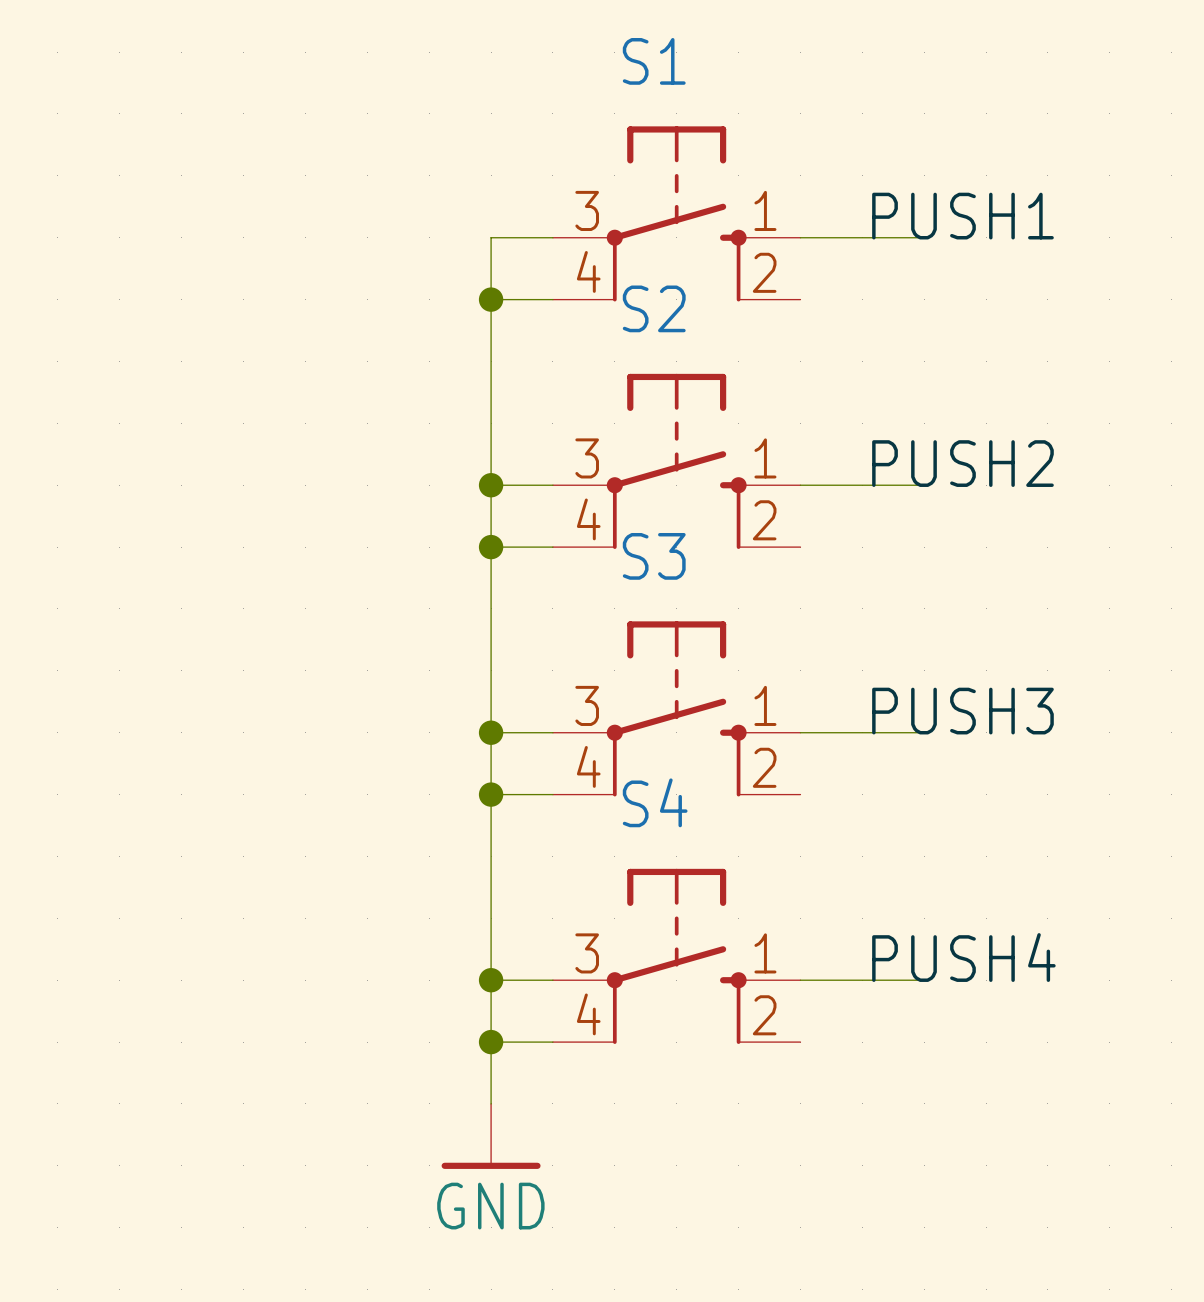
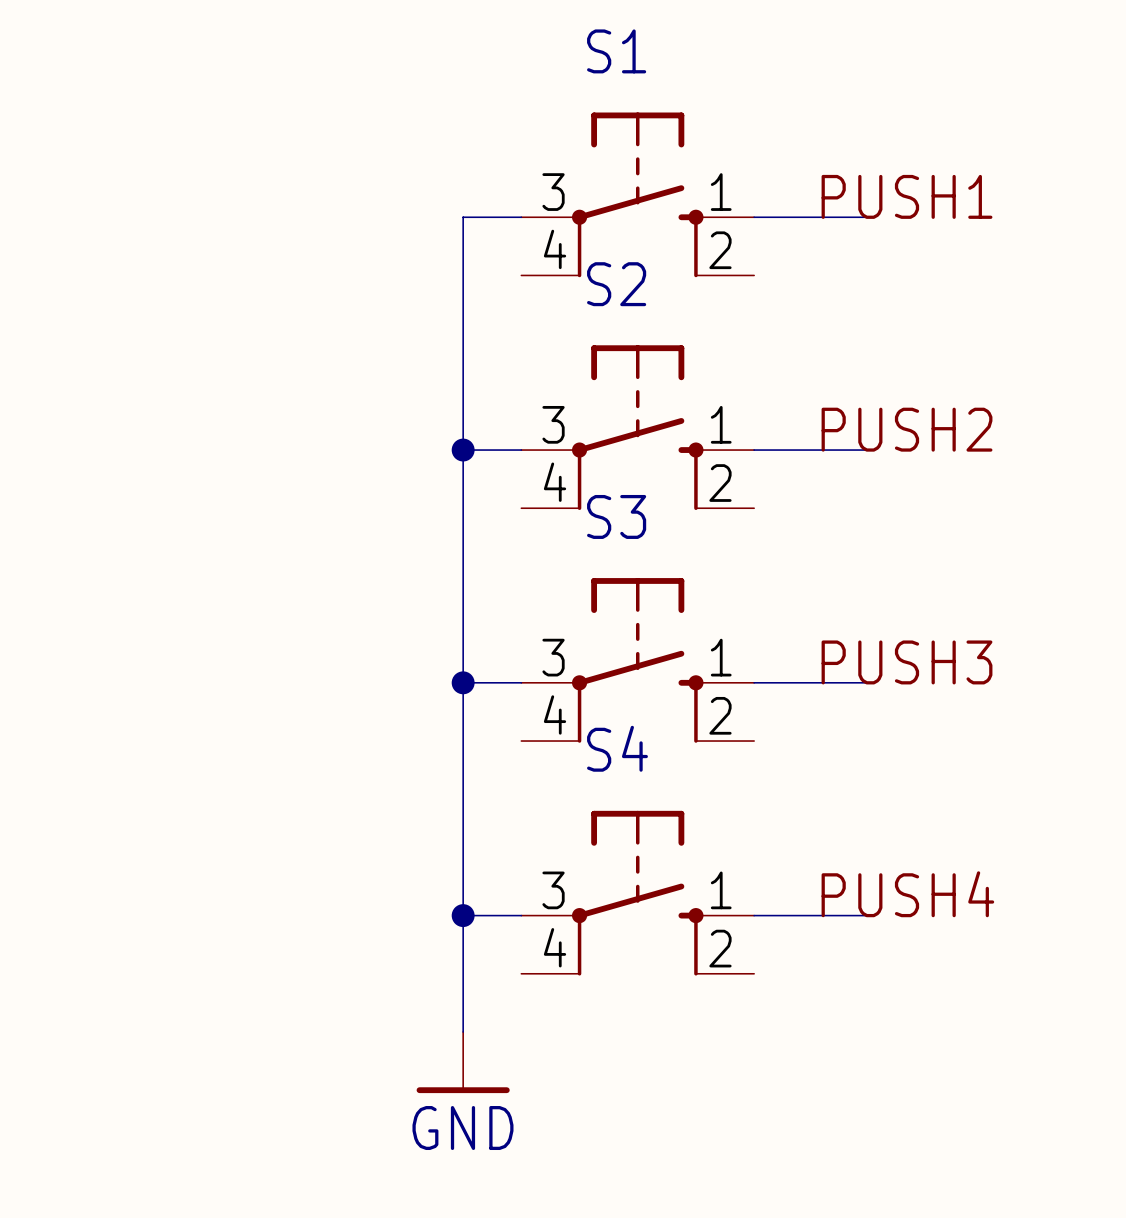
wire: (491, 299) (552, 299) -> none
junction: (491, 299) -> none
wire: (491, 547) (552, 547) -> none
junction: (491, 547) -> none
wire: (491, 794) (552, 794) -> none
junction: (491, 794) -> none
wire: (491, 1042) (552, 1042) -> none
junction: (491, 1042) -> none

